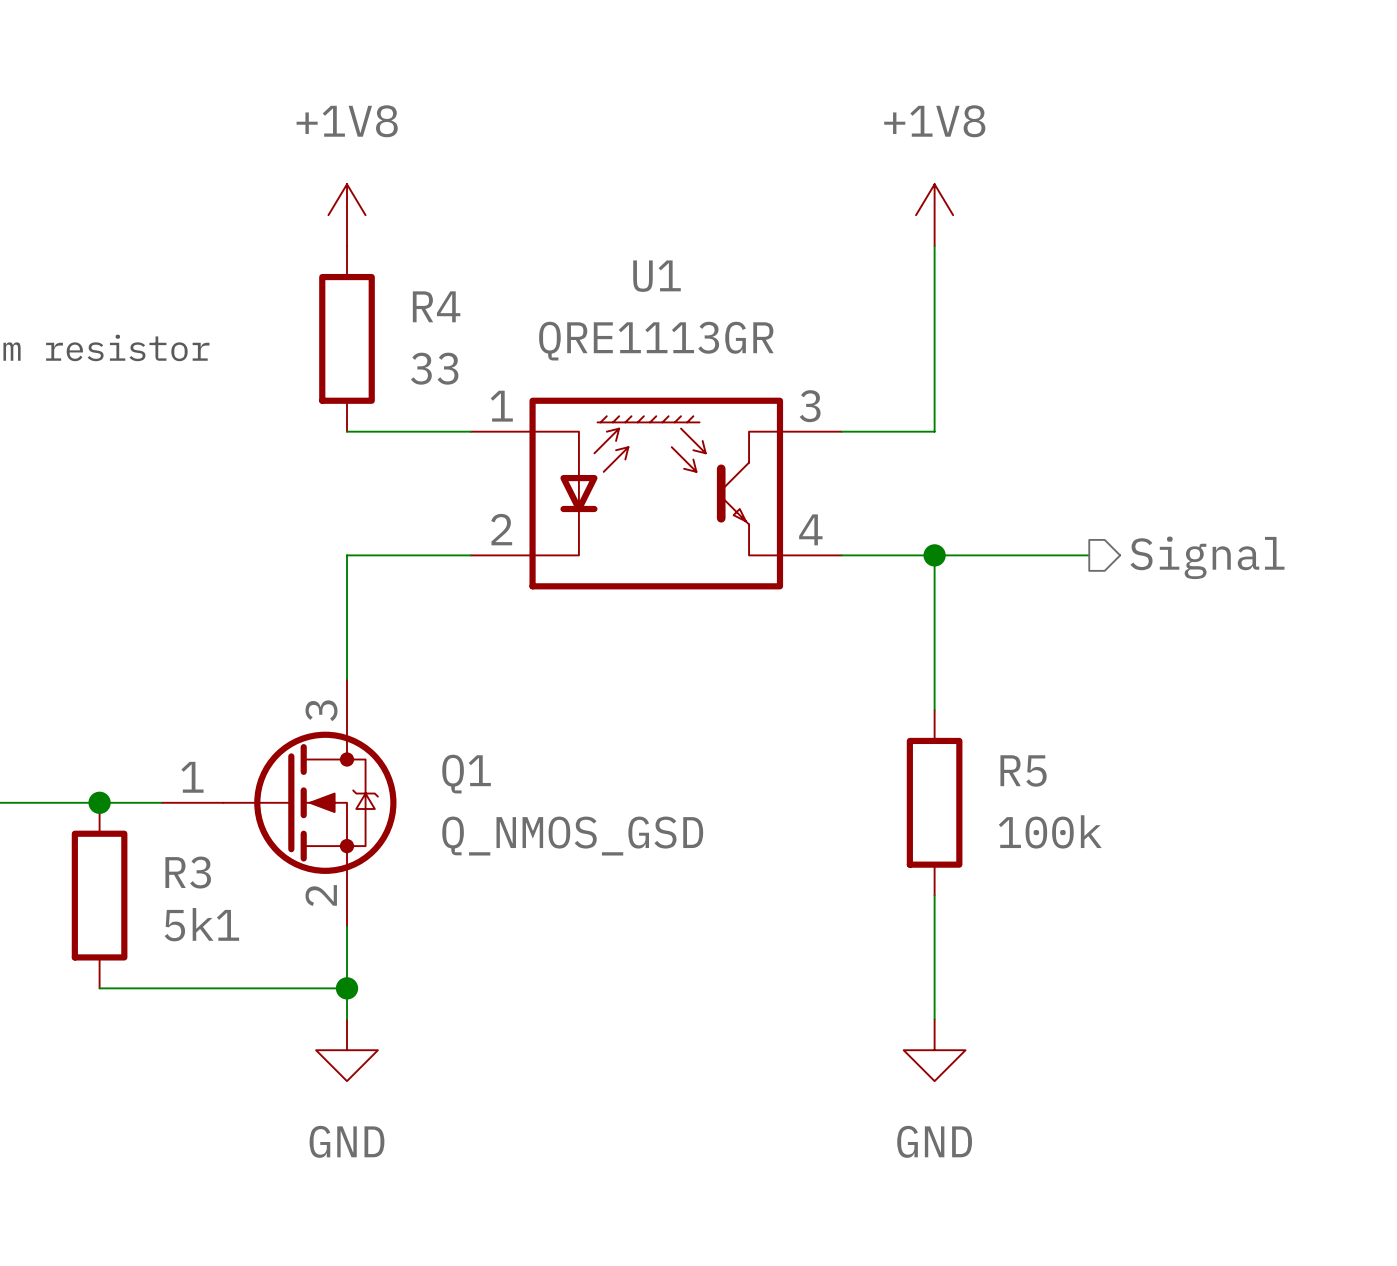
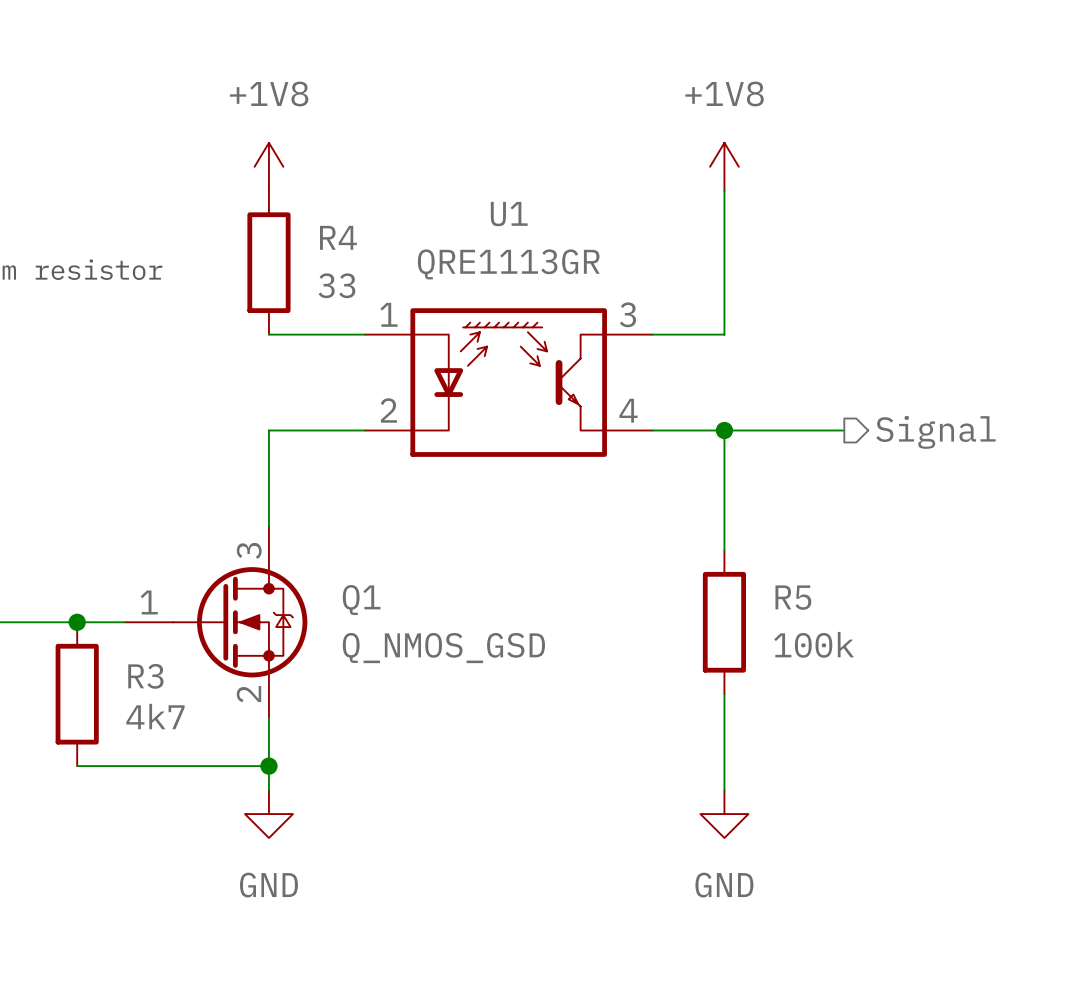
R3 value: 5k1 (201, 924) -> 4k7 (155, 716)

